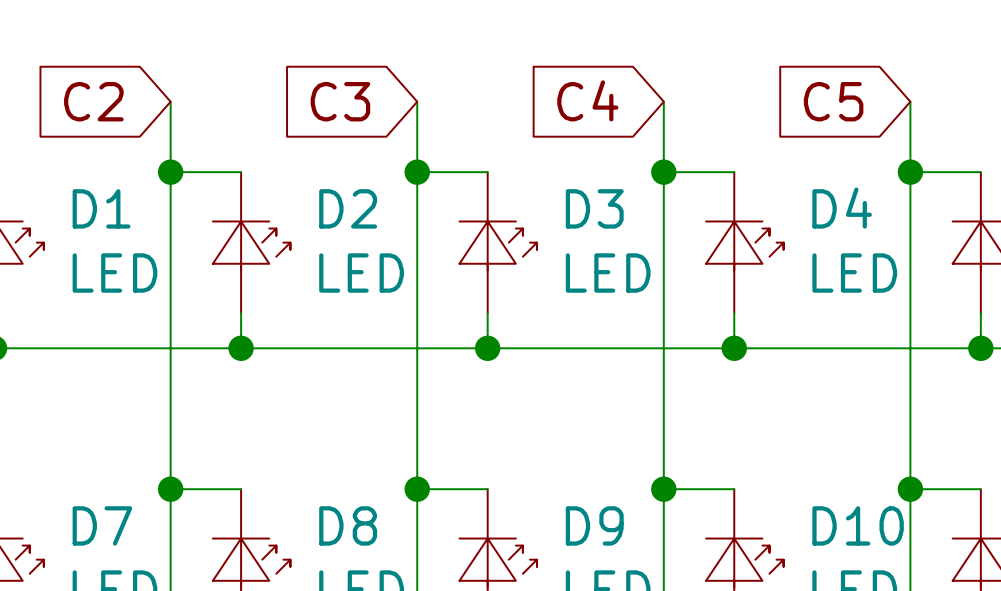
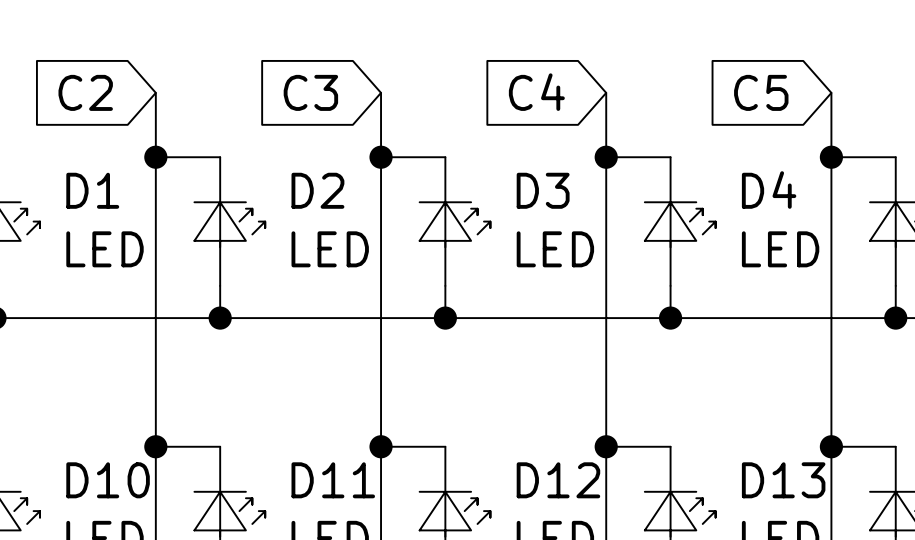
D7 name: D7 (102, 525) -> D10 (108, 480)
D8 name: D8 (348, 525) -> D11 (333, 480)
D9 name: D9 (594, 525) -> D12 (558, 480)
D10 name: D10 (858, 525) -> D13 (783, 480)

